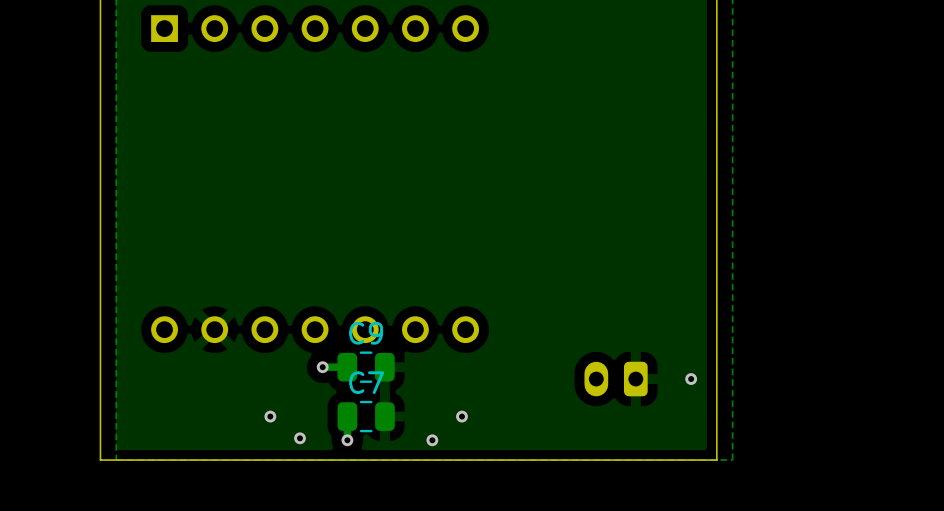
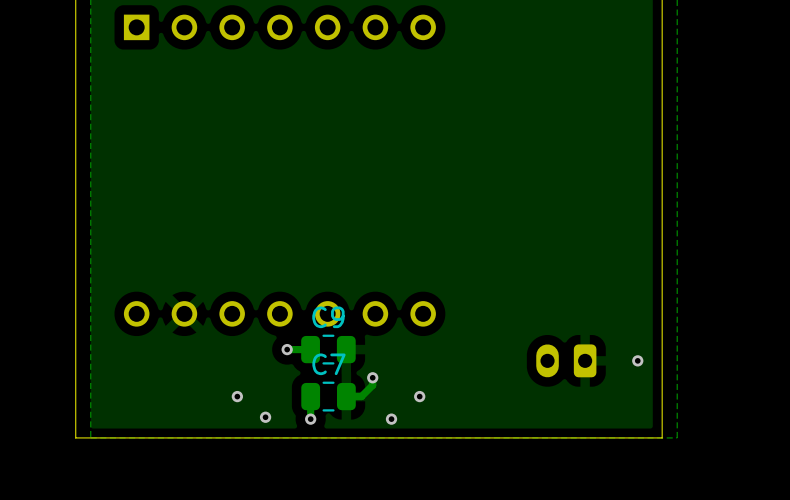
track: none -> (372, 377) (372, 385) (361, 396) (346, 396)
via: none -> (372, 377)

